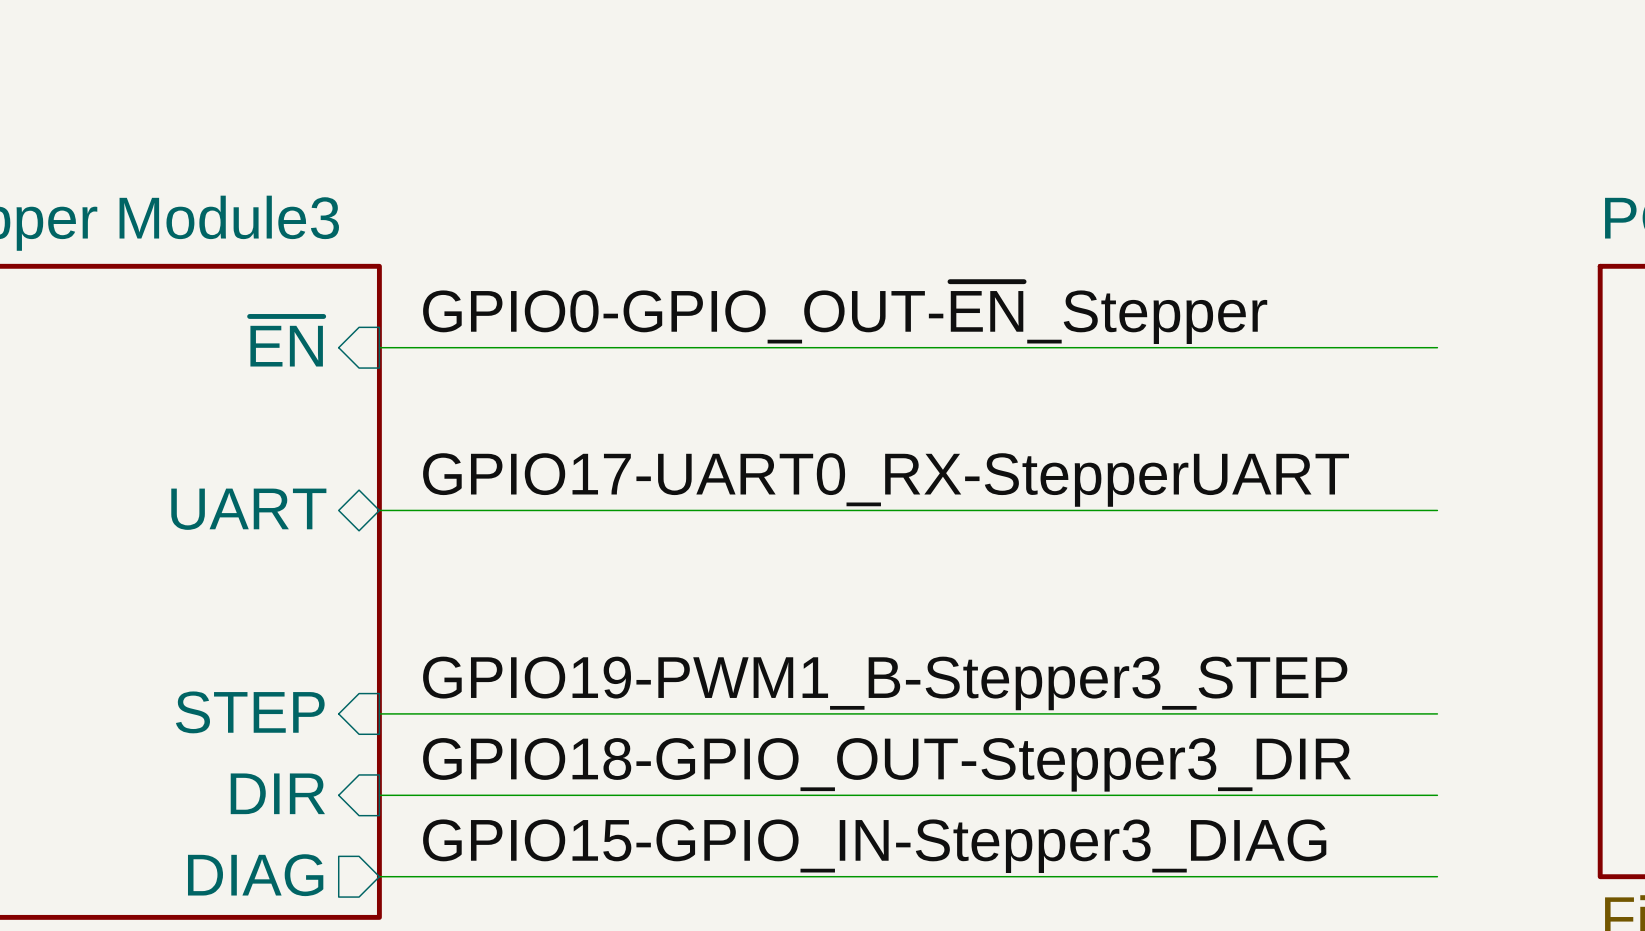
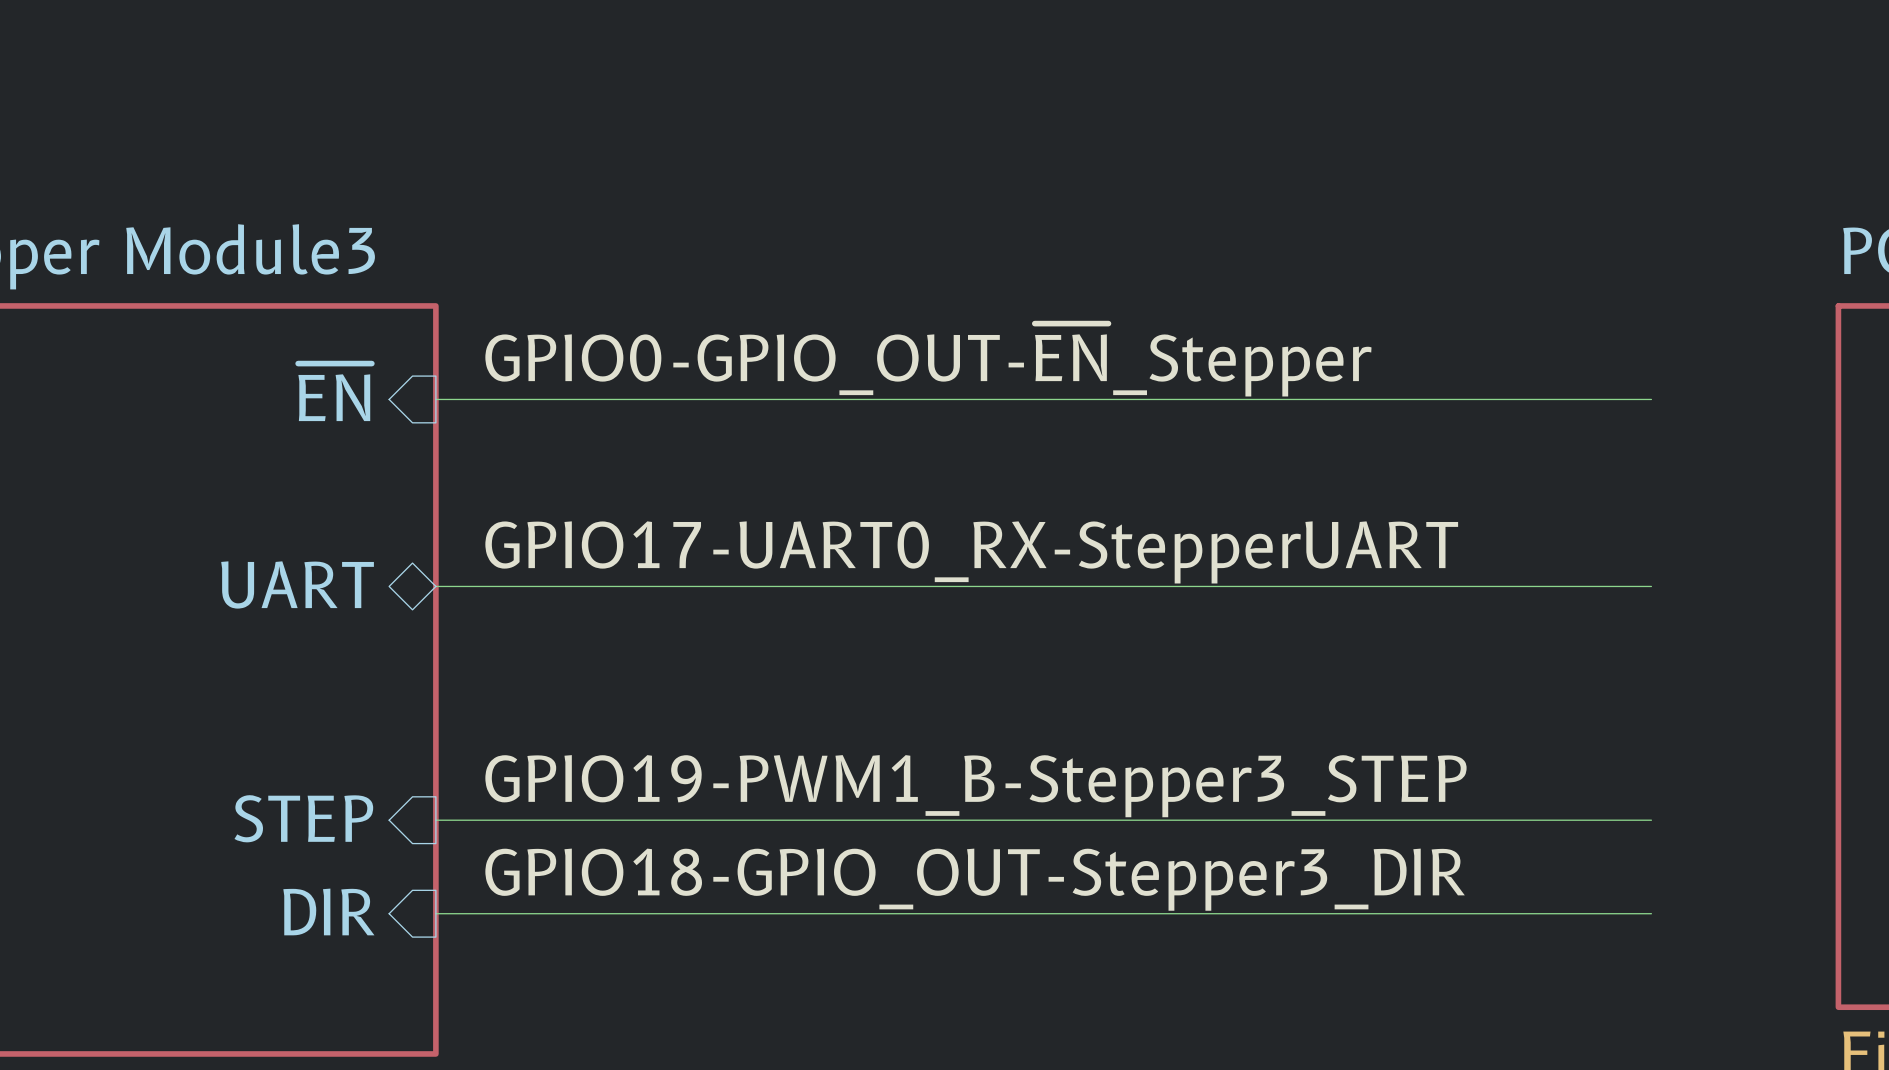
label: GPIO15-GPIO_IN-Stepper3_DIAG (874, 846) -> none
sheet pin: DIAG (255, 875) -> none
wire: (379, 876) (1437, 876) -> none

